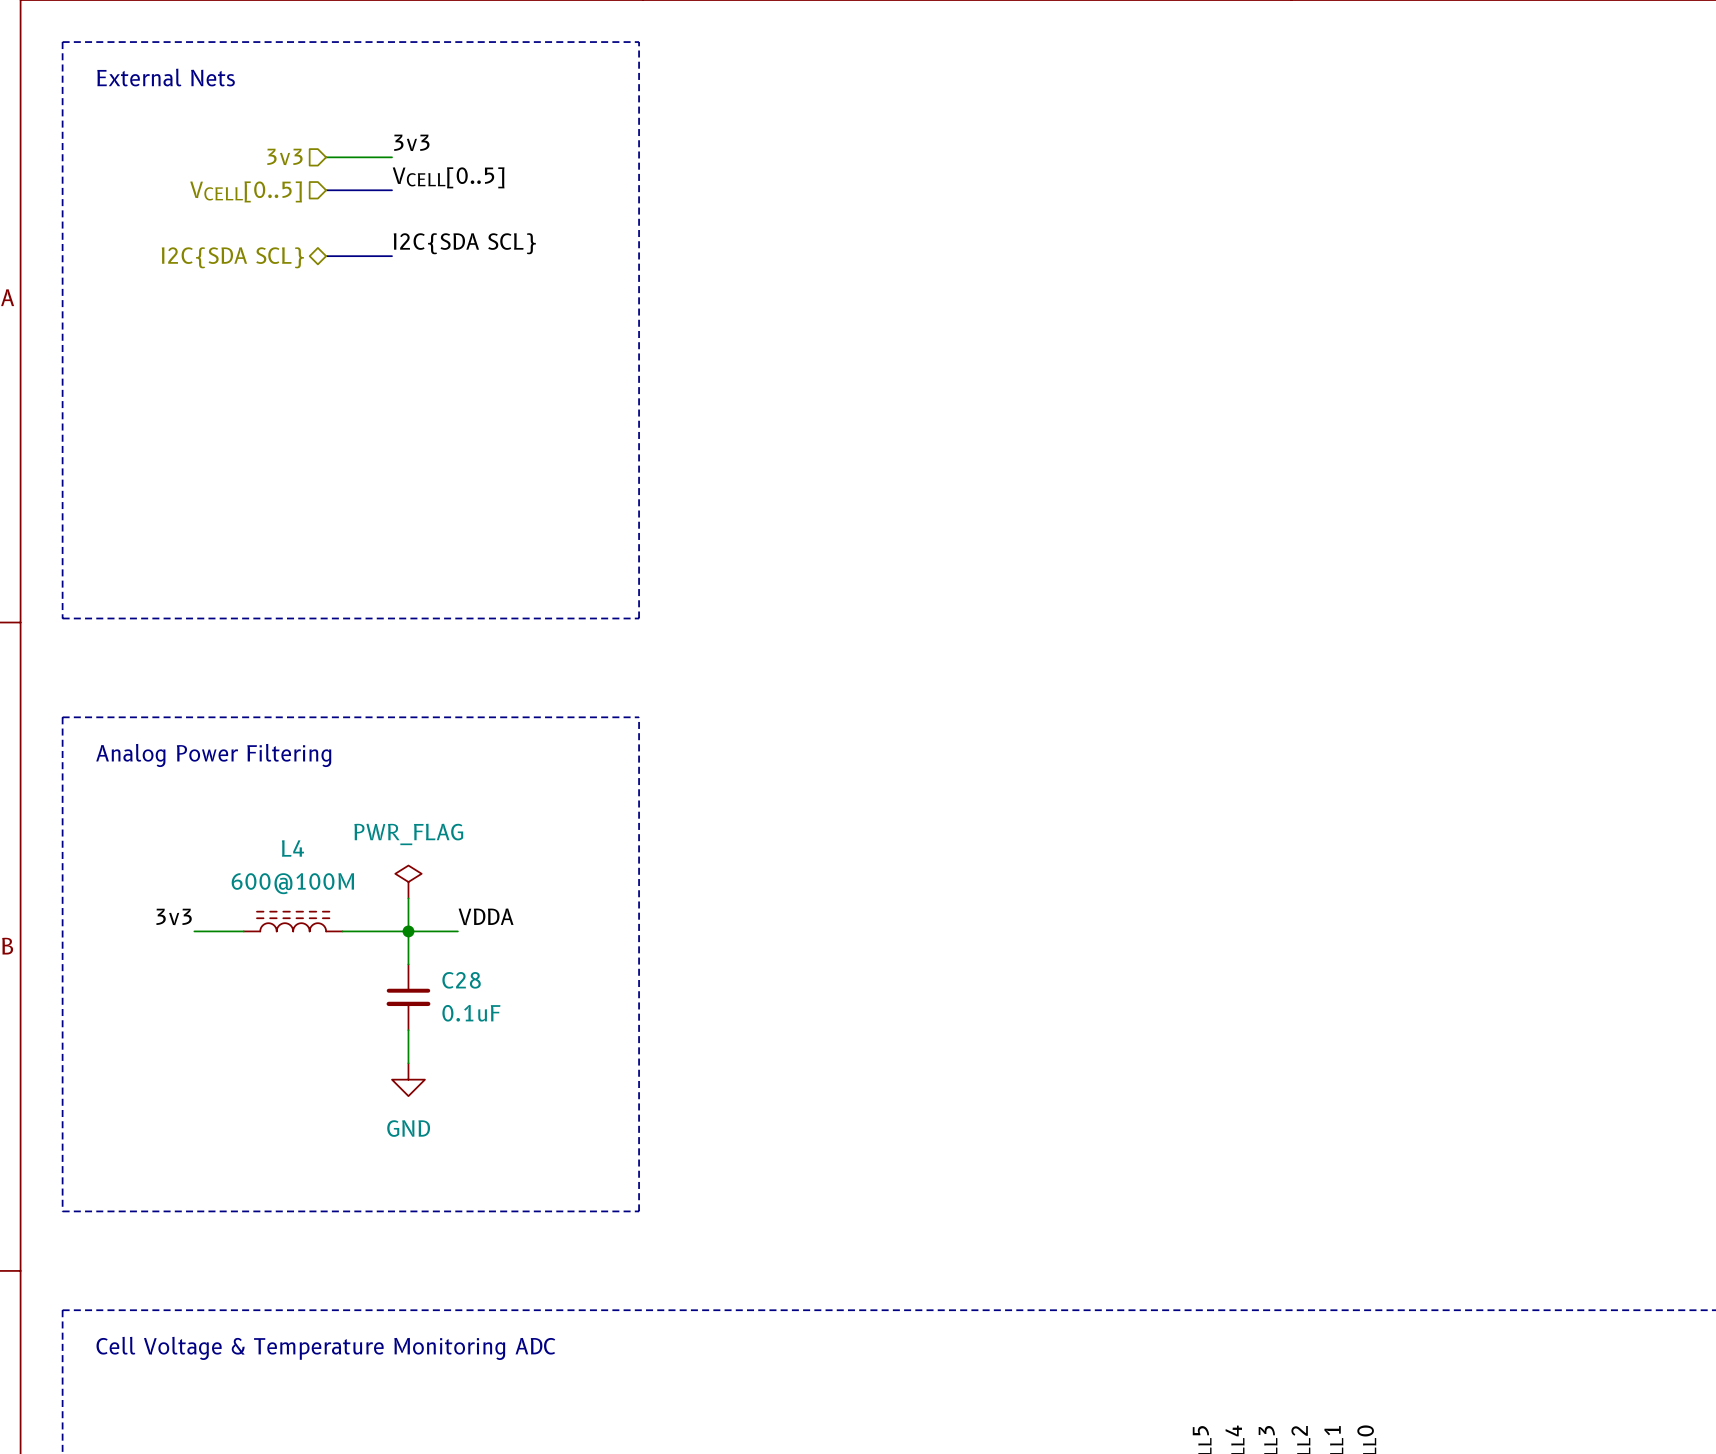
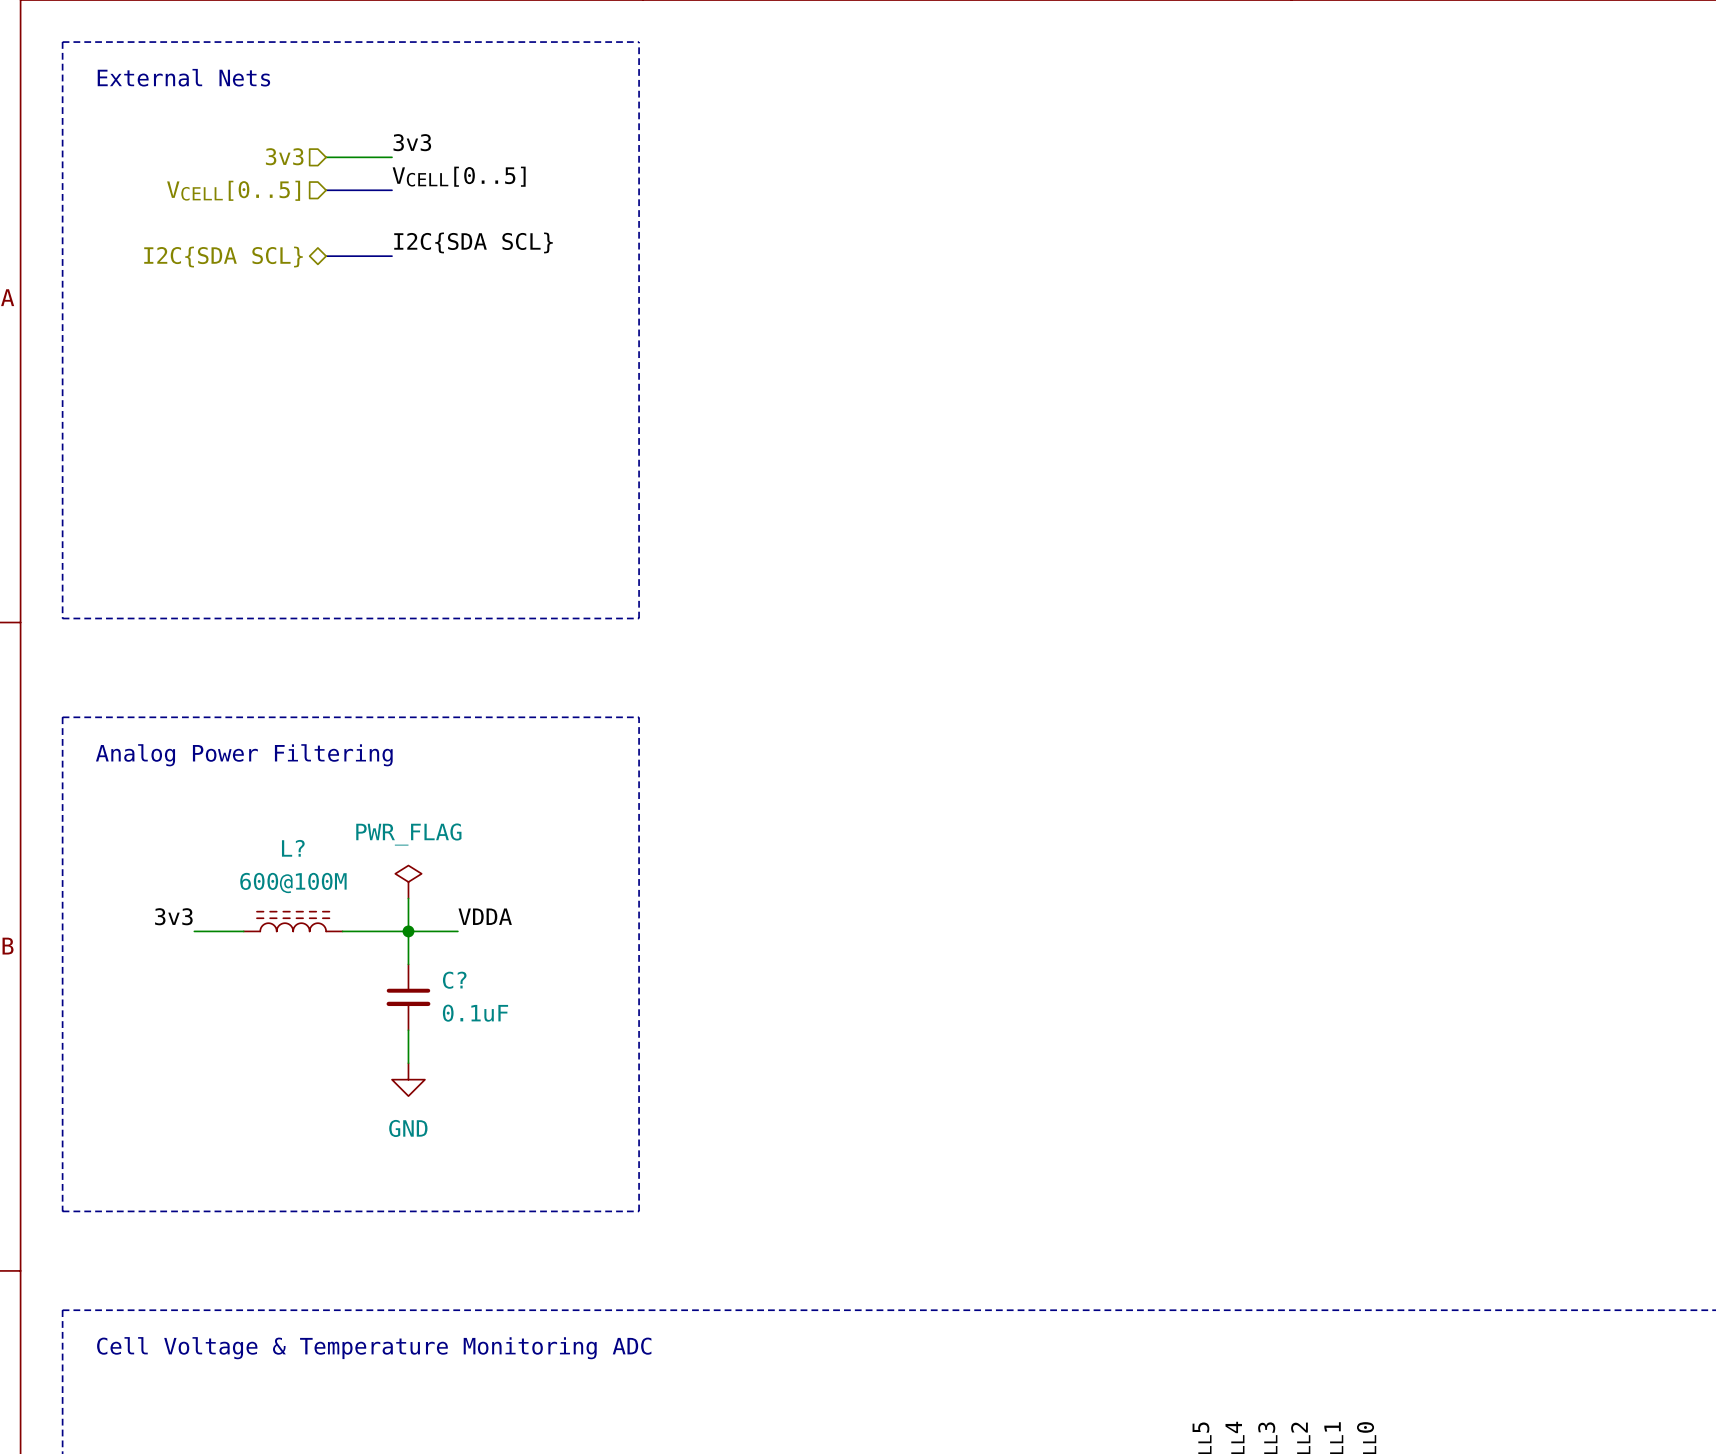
L4 name: L4 (292, 848) -> L? (293, 848)
C28 name: C28 (461, 980) -> C? (454, 980)

